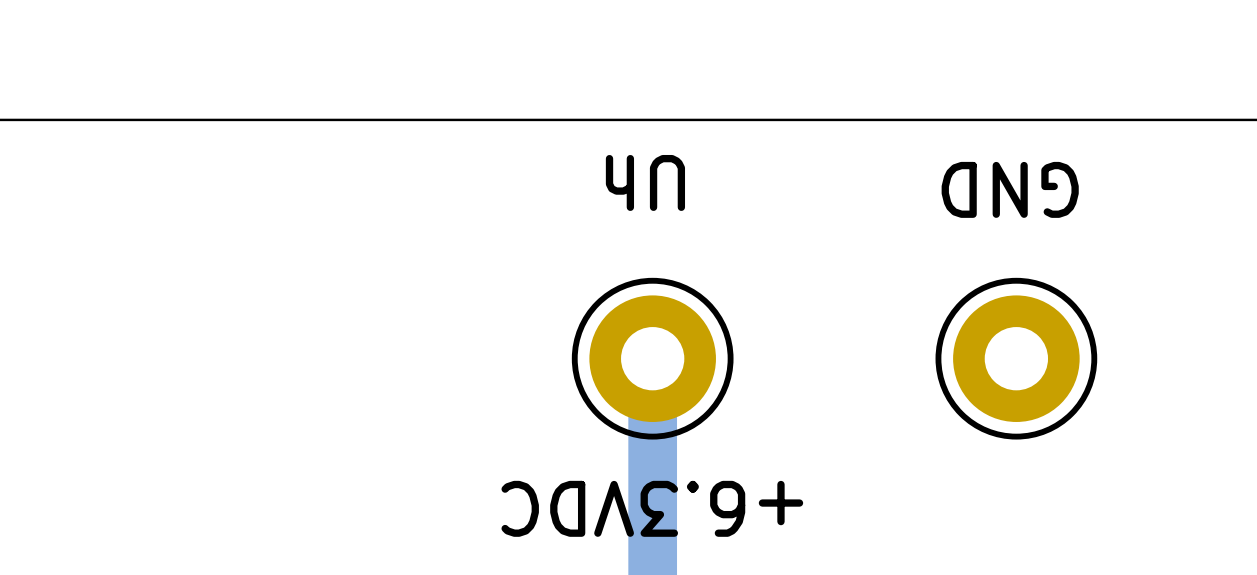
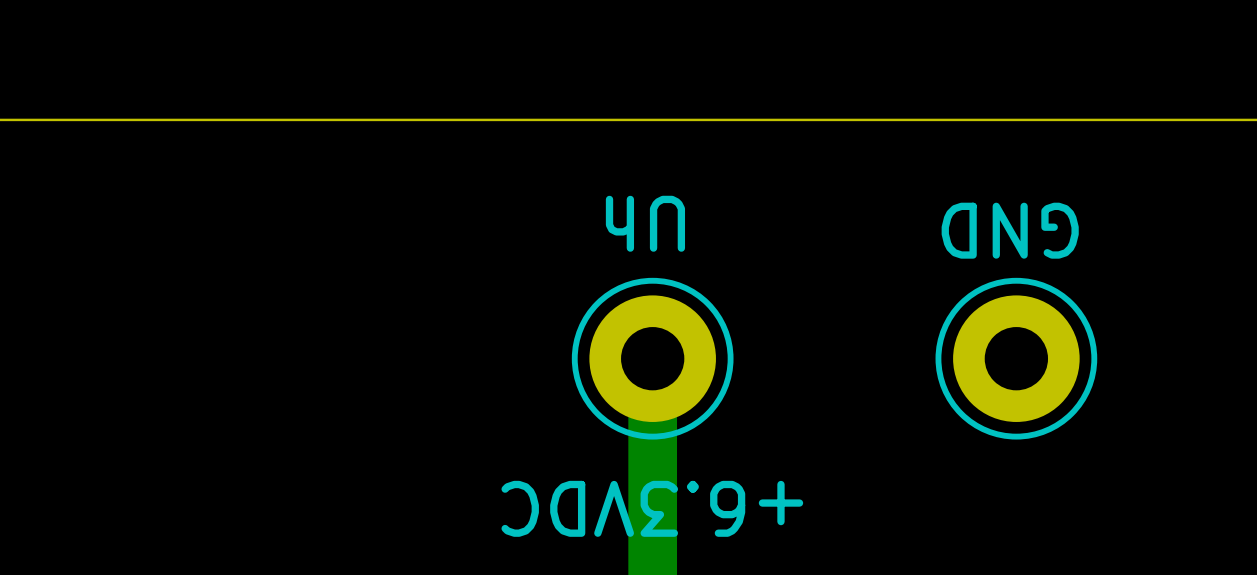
text position: Uh (645, 182) -> Uh (645, 223)
text position: GND (1010, 189) -> GND (1010, 230)

